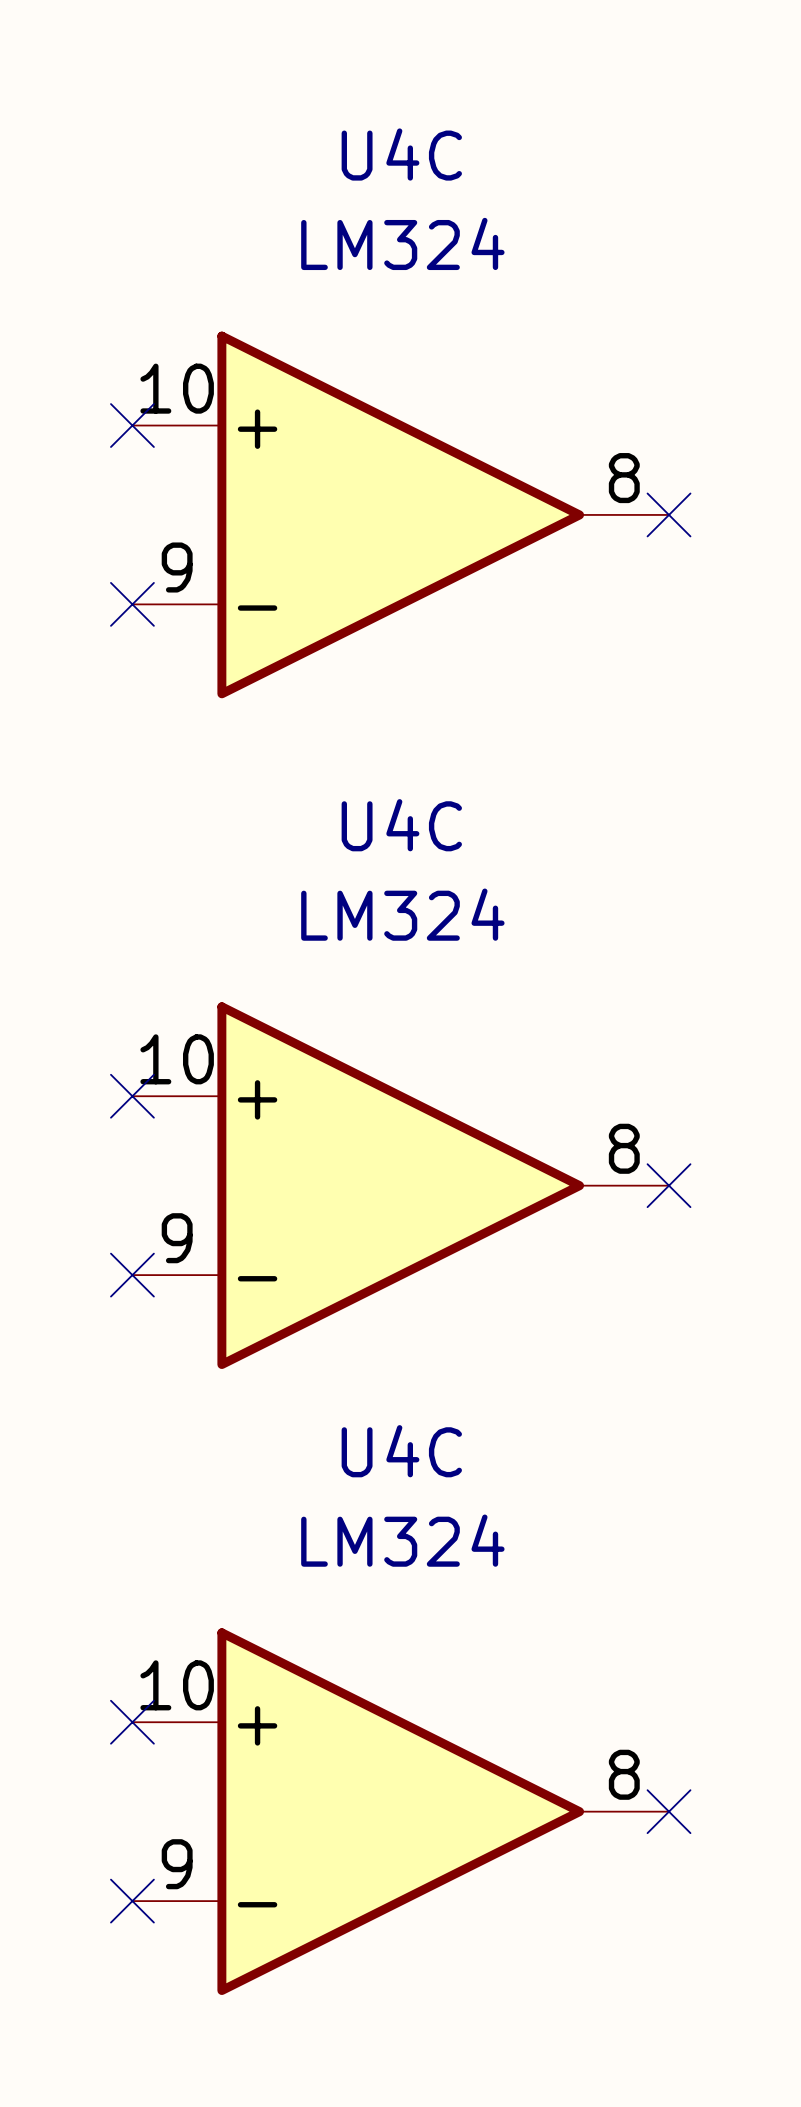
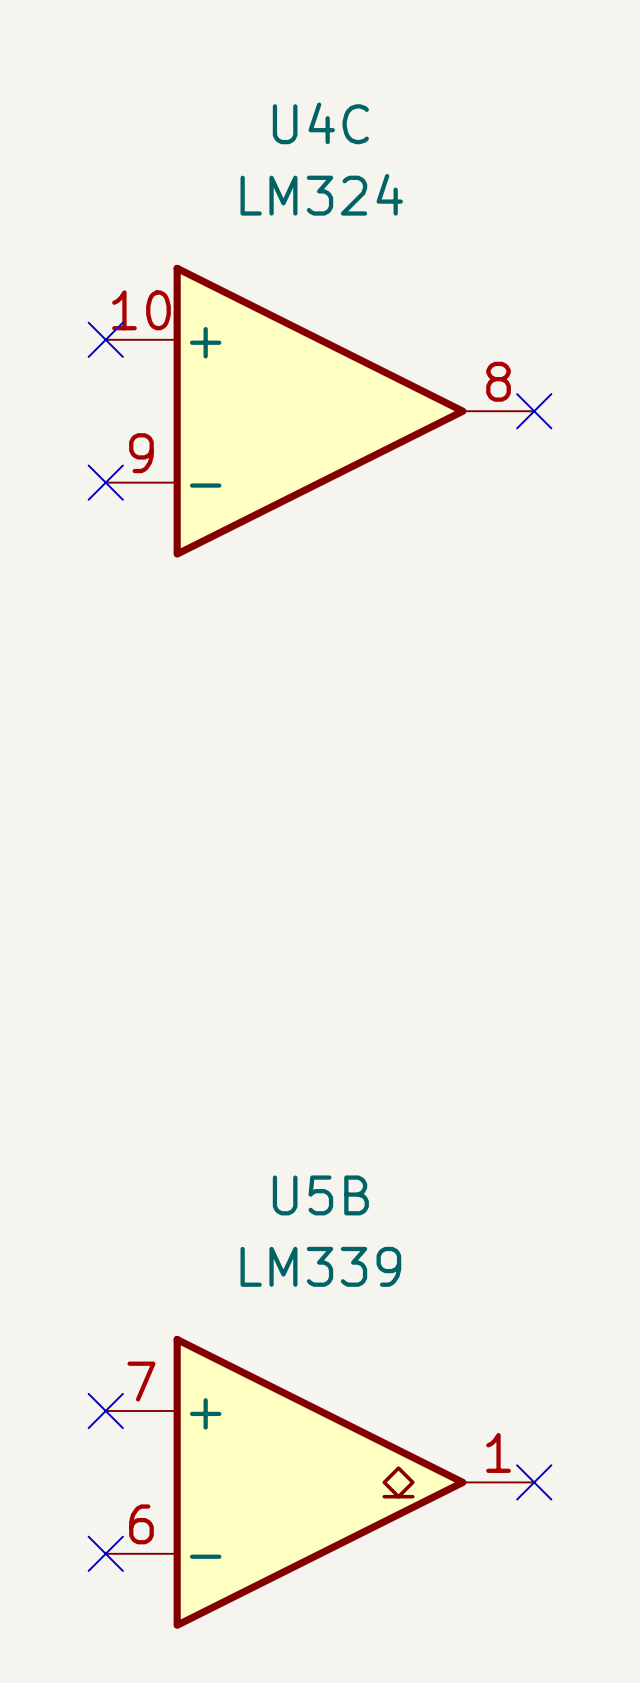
no-connect mark: (132, 1096) -> none
U4C: LM324 (400, 1185) -> none
no-connect mark: (669, 1185) -> none
no-connect mark: (132, 1275) -> none
no-connect mark position: (132, 1722) -> (105, 1411)
U4C: LM324 (400, 1811) -> none
no-connect mark position: (669, 1811) -> (534, 1482)
U5B: none -> LM339 (320, 1482)
no-connect mark position: (132, 1901) -> (105, 1553)

